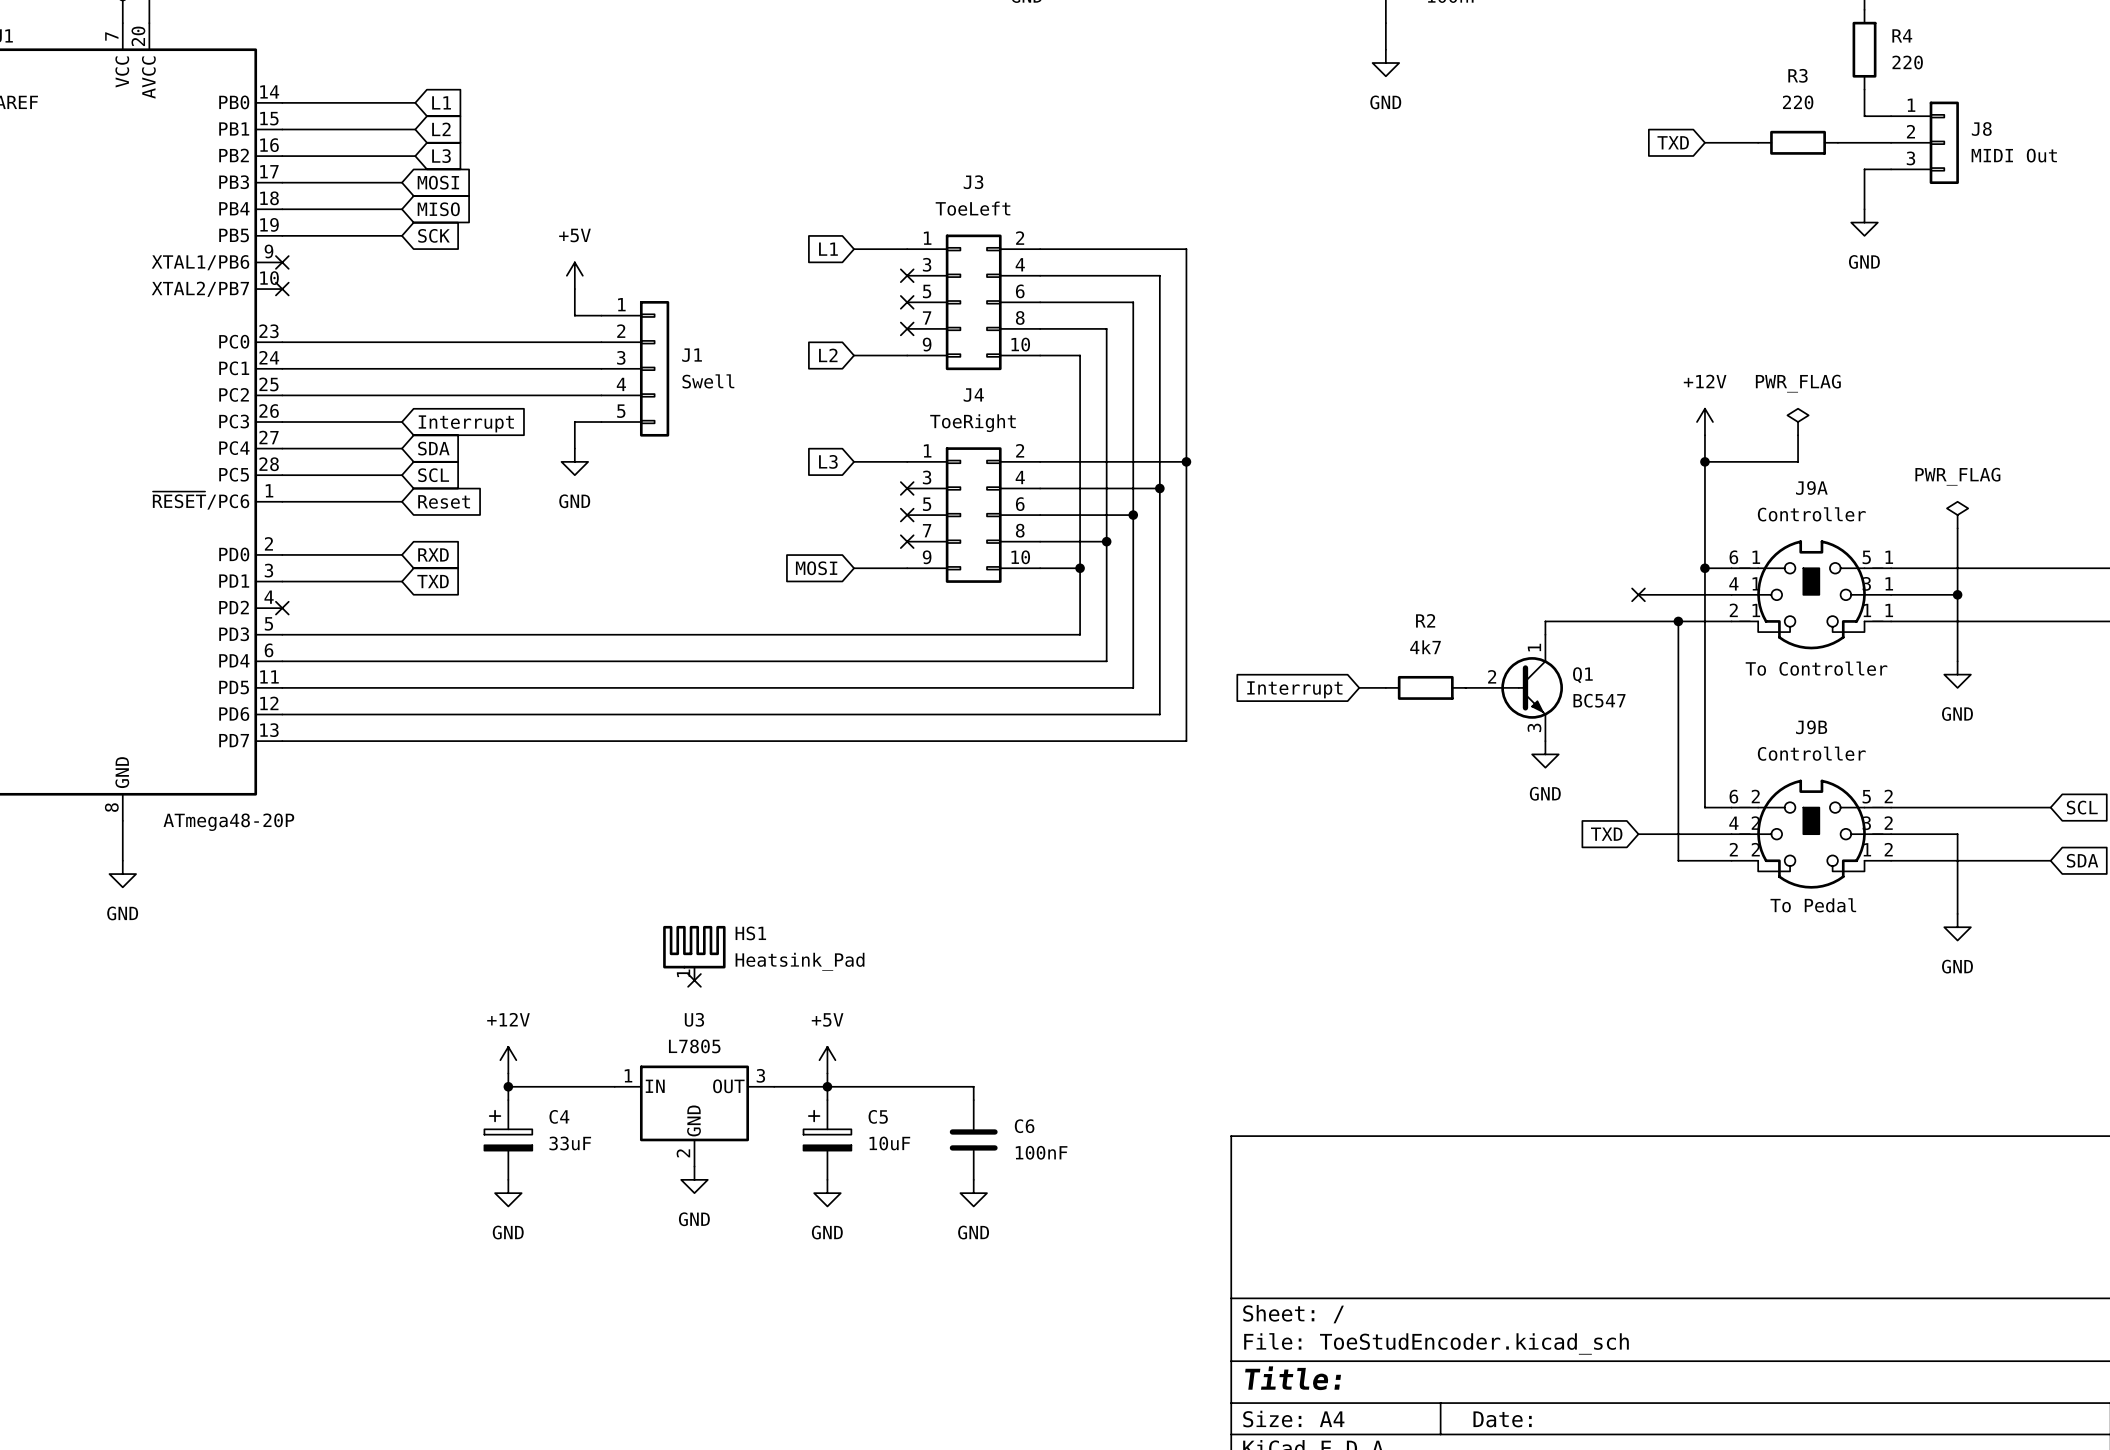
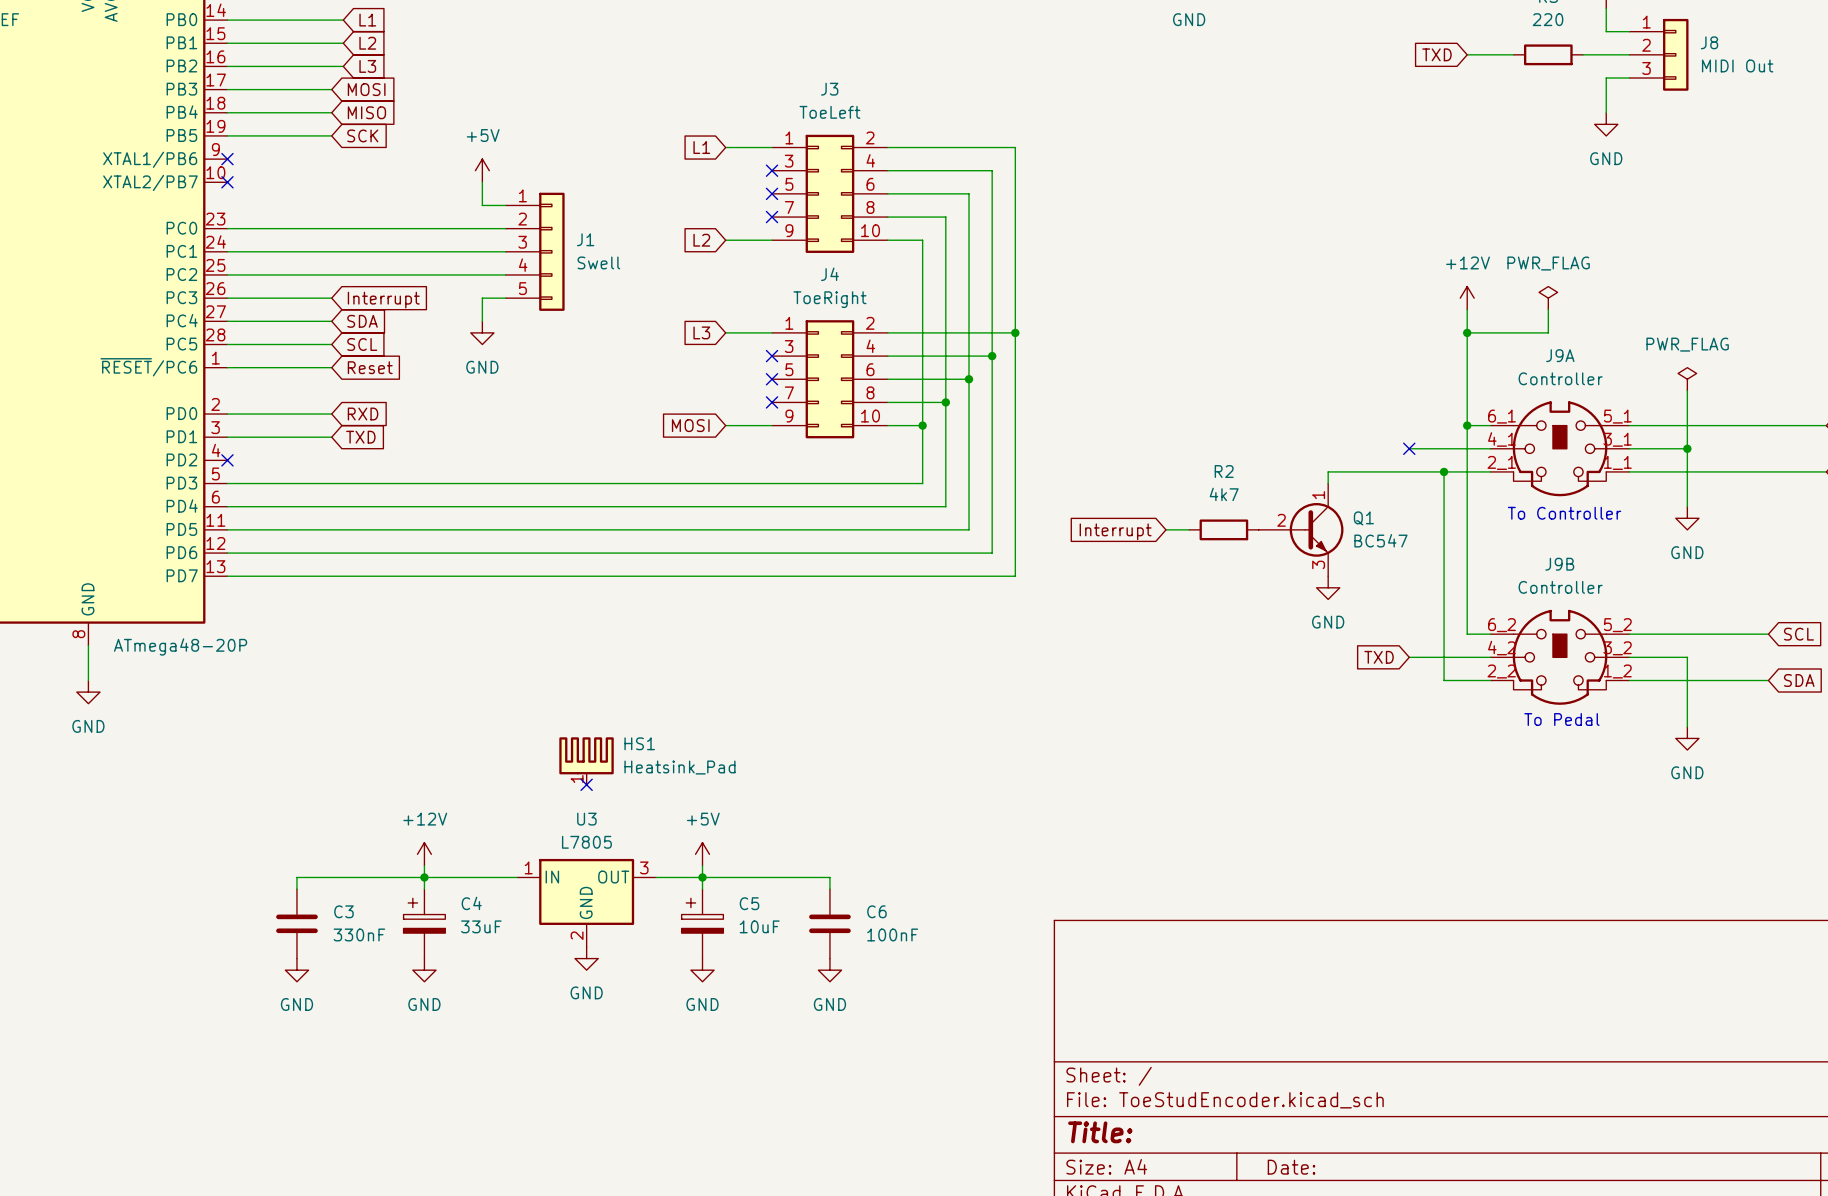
wire: none -> (424, 877) (296, 877) (296, 889)
C3: none -> 330nF (296, 923)
power symbol: none -> GND (296, 970)

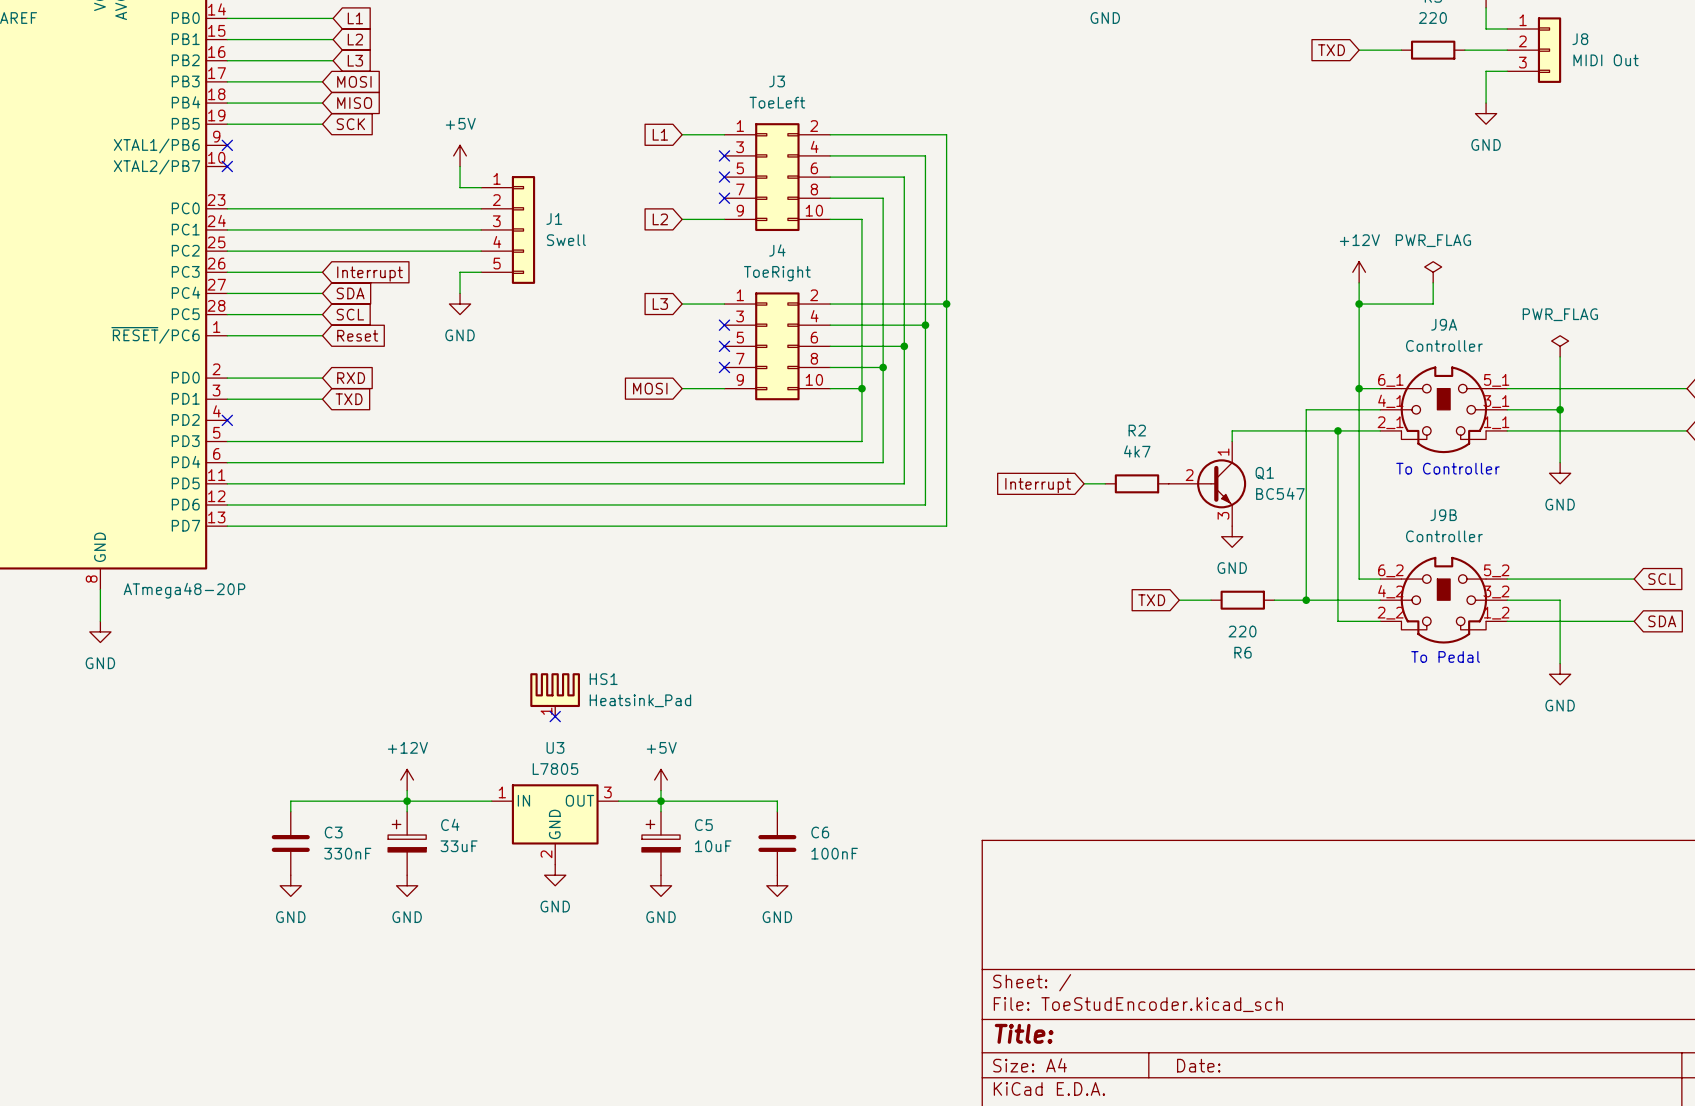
wire: none -> (1306, 409) (1306, 600) (1274, 600)
no-connect mark: (1409, 448) -> none
wire: none -> (1179, 600) (1211, 600)
R6: none -> 220 (1242, 600)
global label position: TXD (1379, 657) -> TXD (1151, 600)
junction: none -> (1306, 600)

